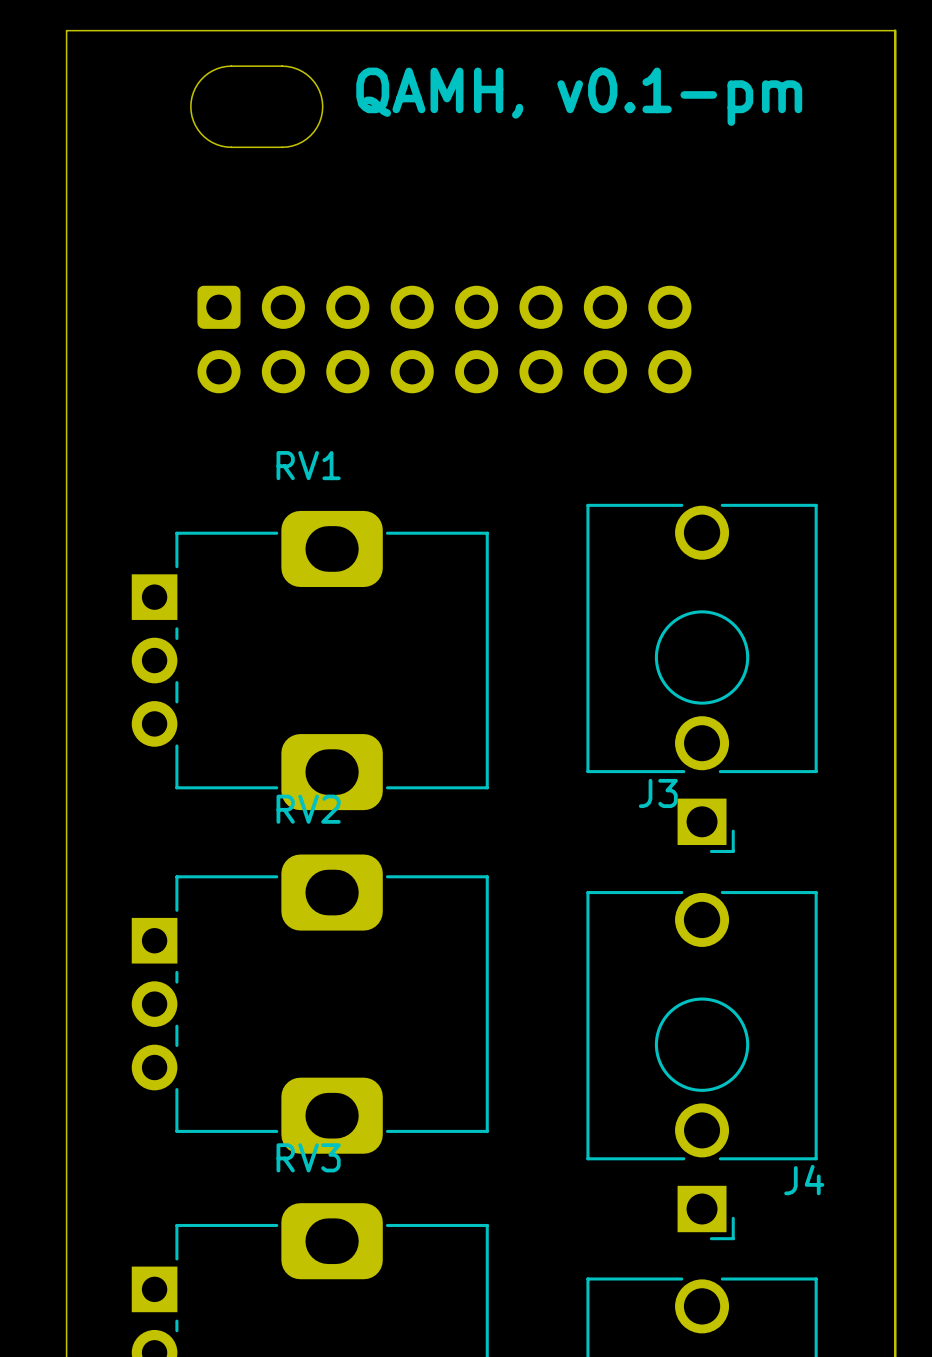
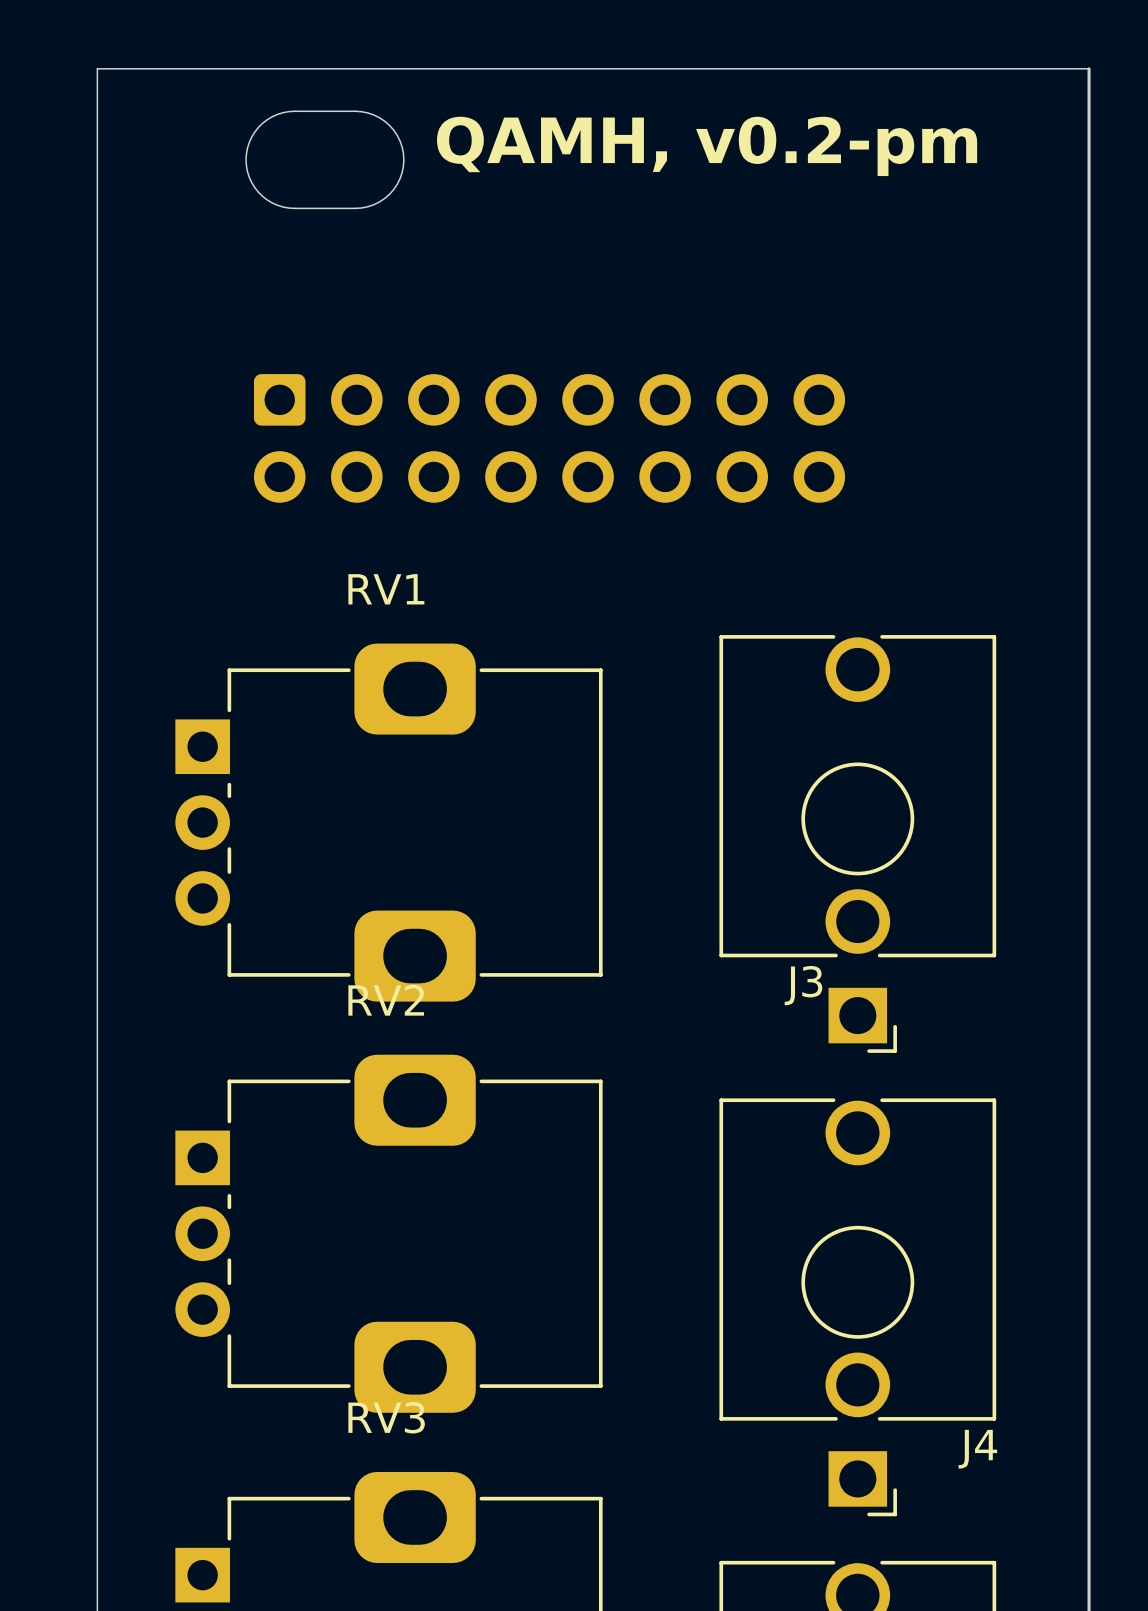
text: QAMH, v0.1-pm (579, 96) -> QAMH, v0.2-pm (707, 146)

